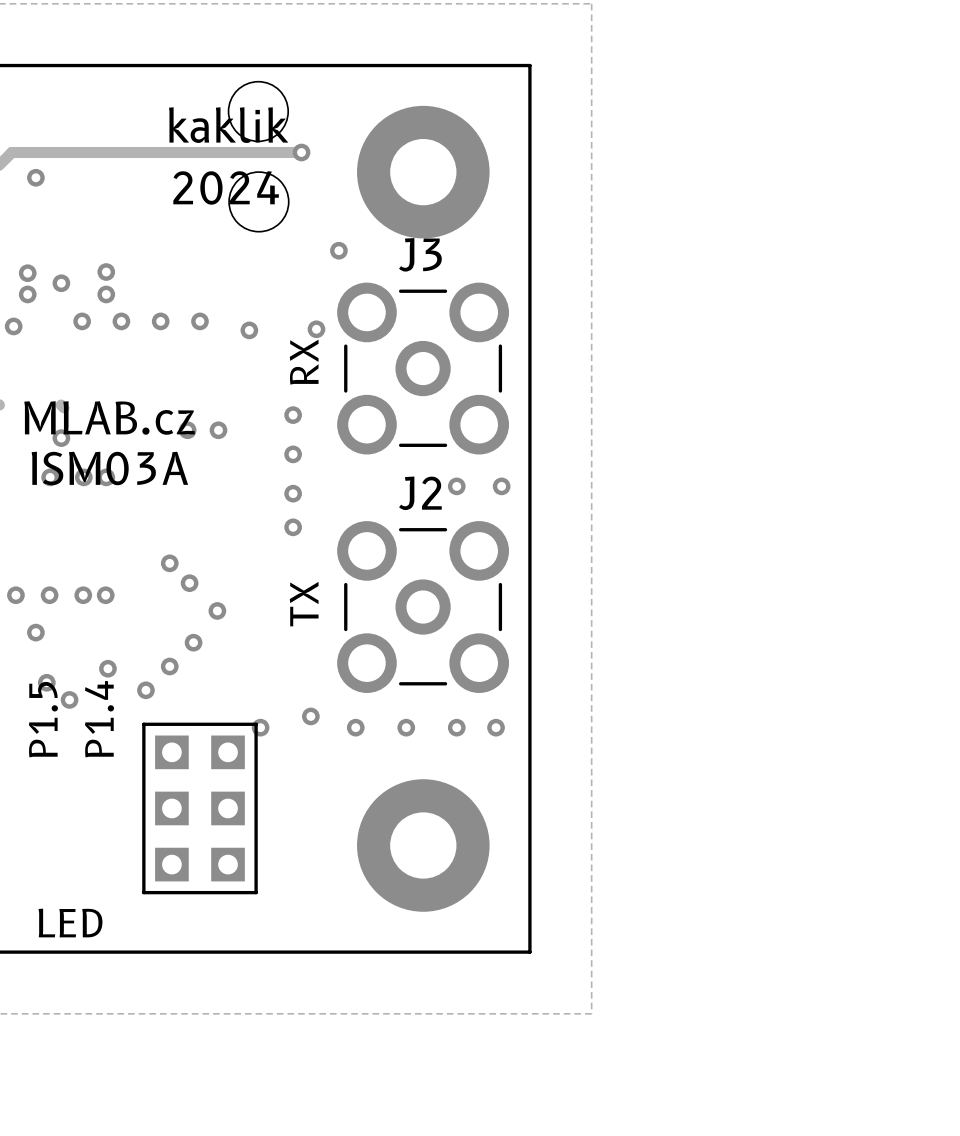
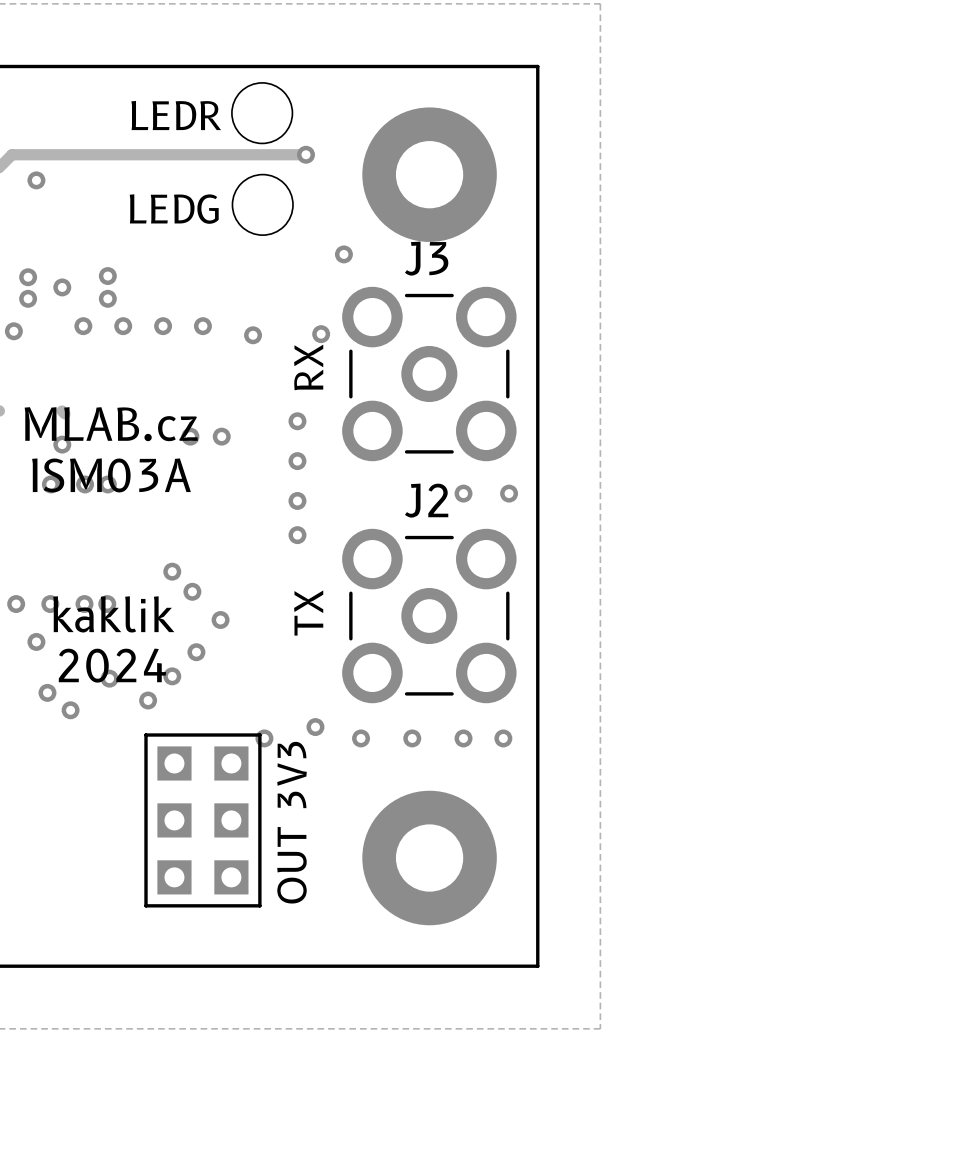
text: kaklik (228, 125) -> LEDR (176, 115)
text: 2024 (226, 187) -> LEDG (174, 209)
text: none -> kaklik (113, 614)
text: none -> 2024 (112, 665)
text: P1.5 (43, 719) -> none
text: P1.4 (99, 719) -> none
text: none -> OUT 3V3 (292, 822)
text: LED (70, 922) -> none

